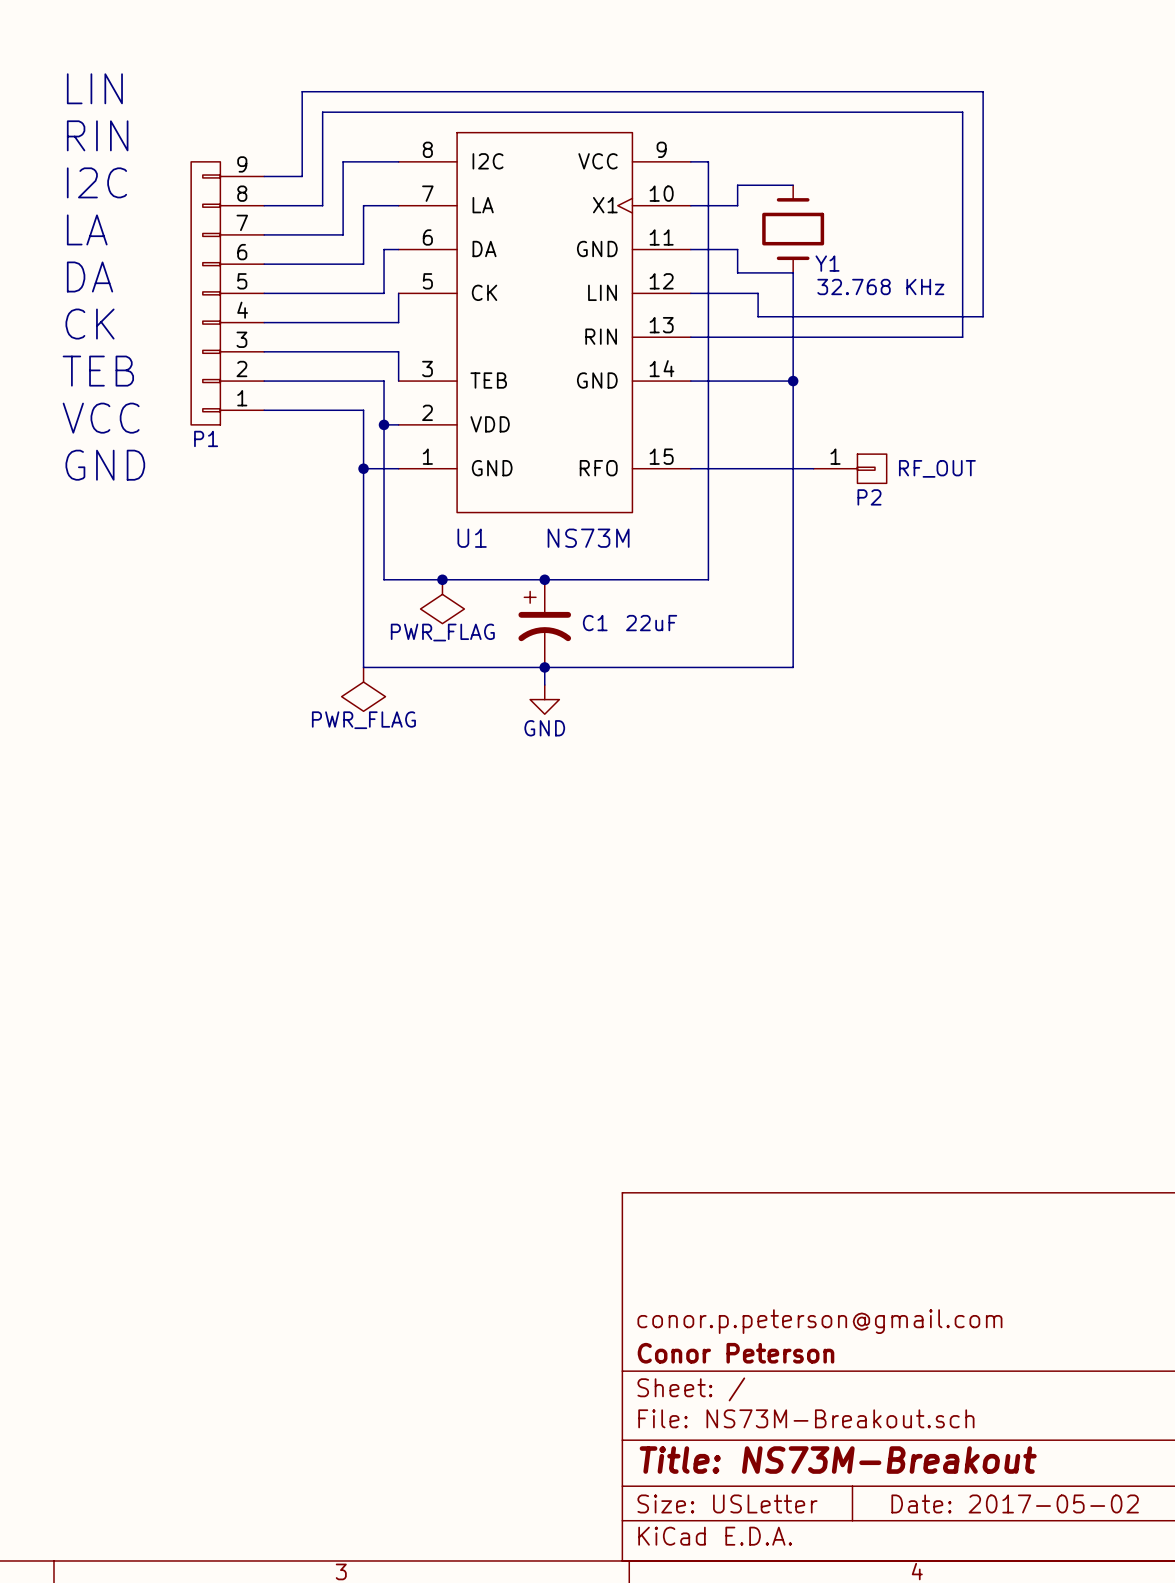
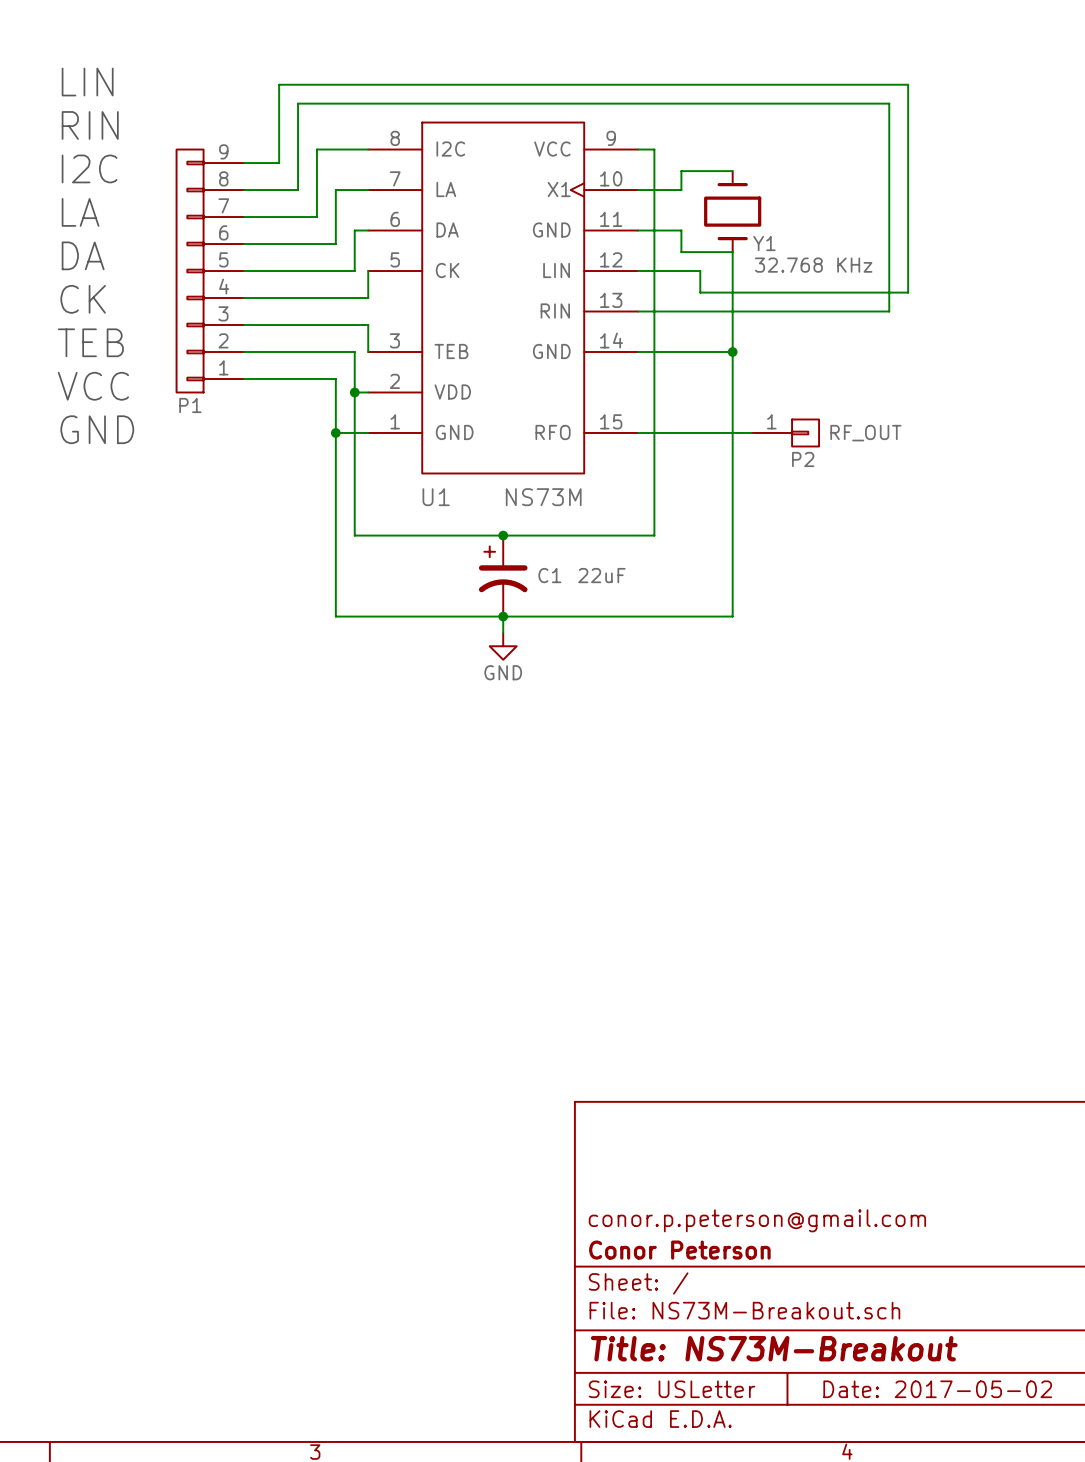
junction: (442, 579) -> none
power symbol: PWR_FLAG (442, 601) -> none
power symbol: PWR_FLAG (363, 689) -> none

